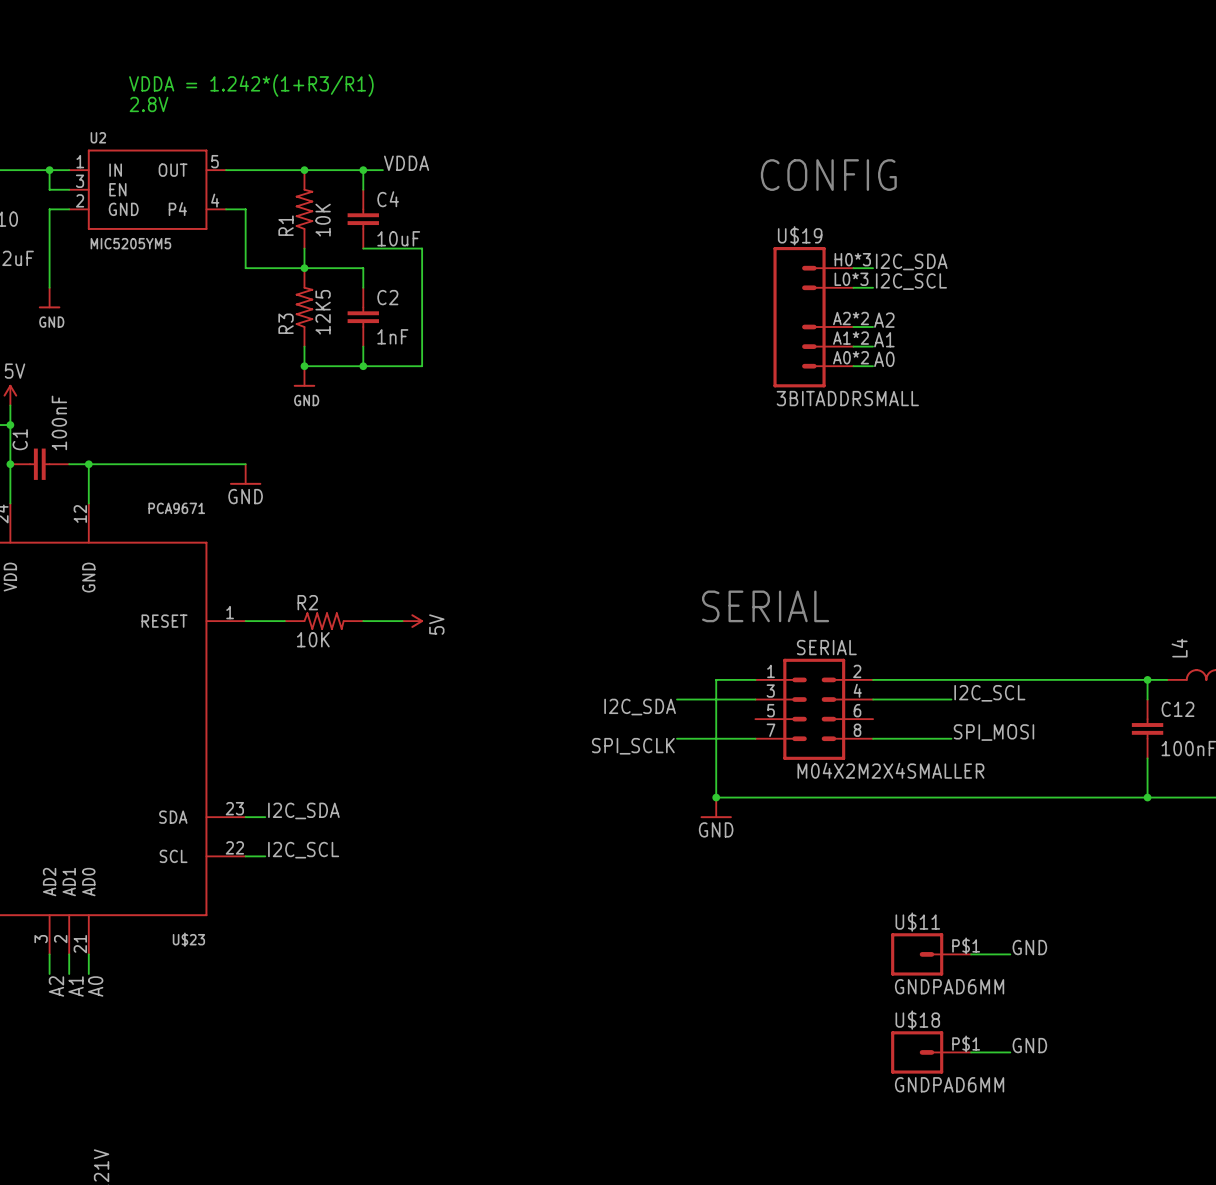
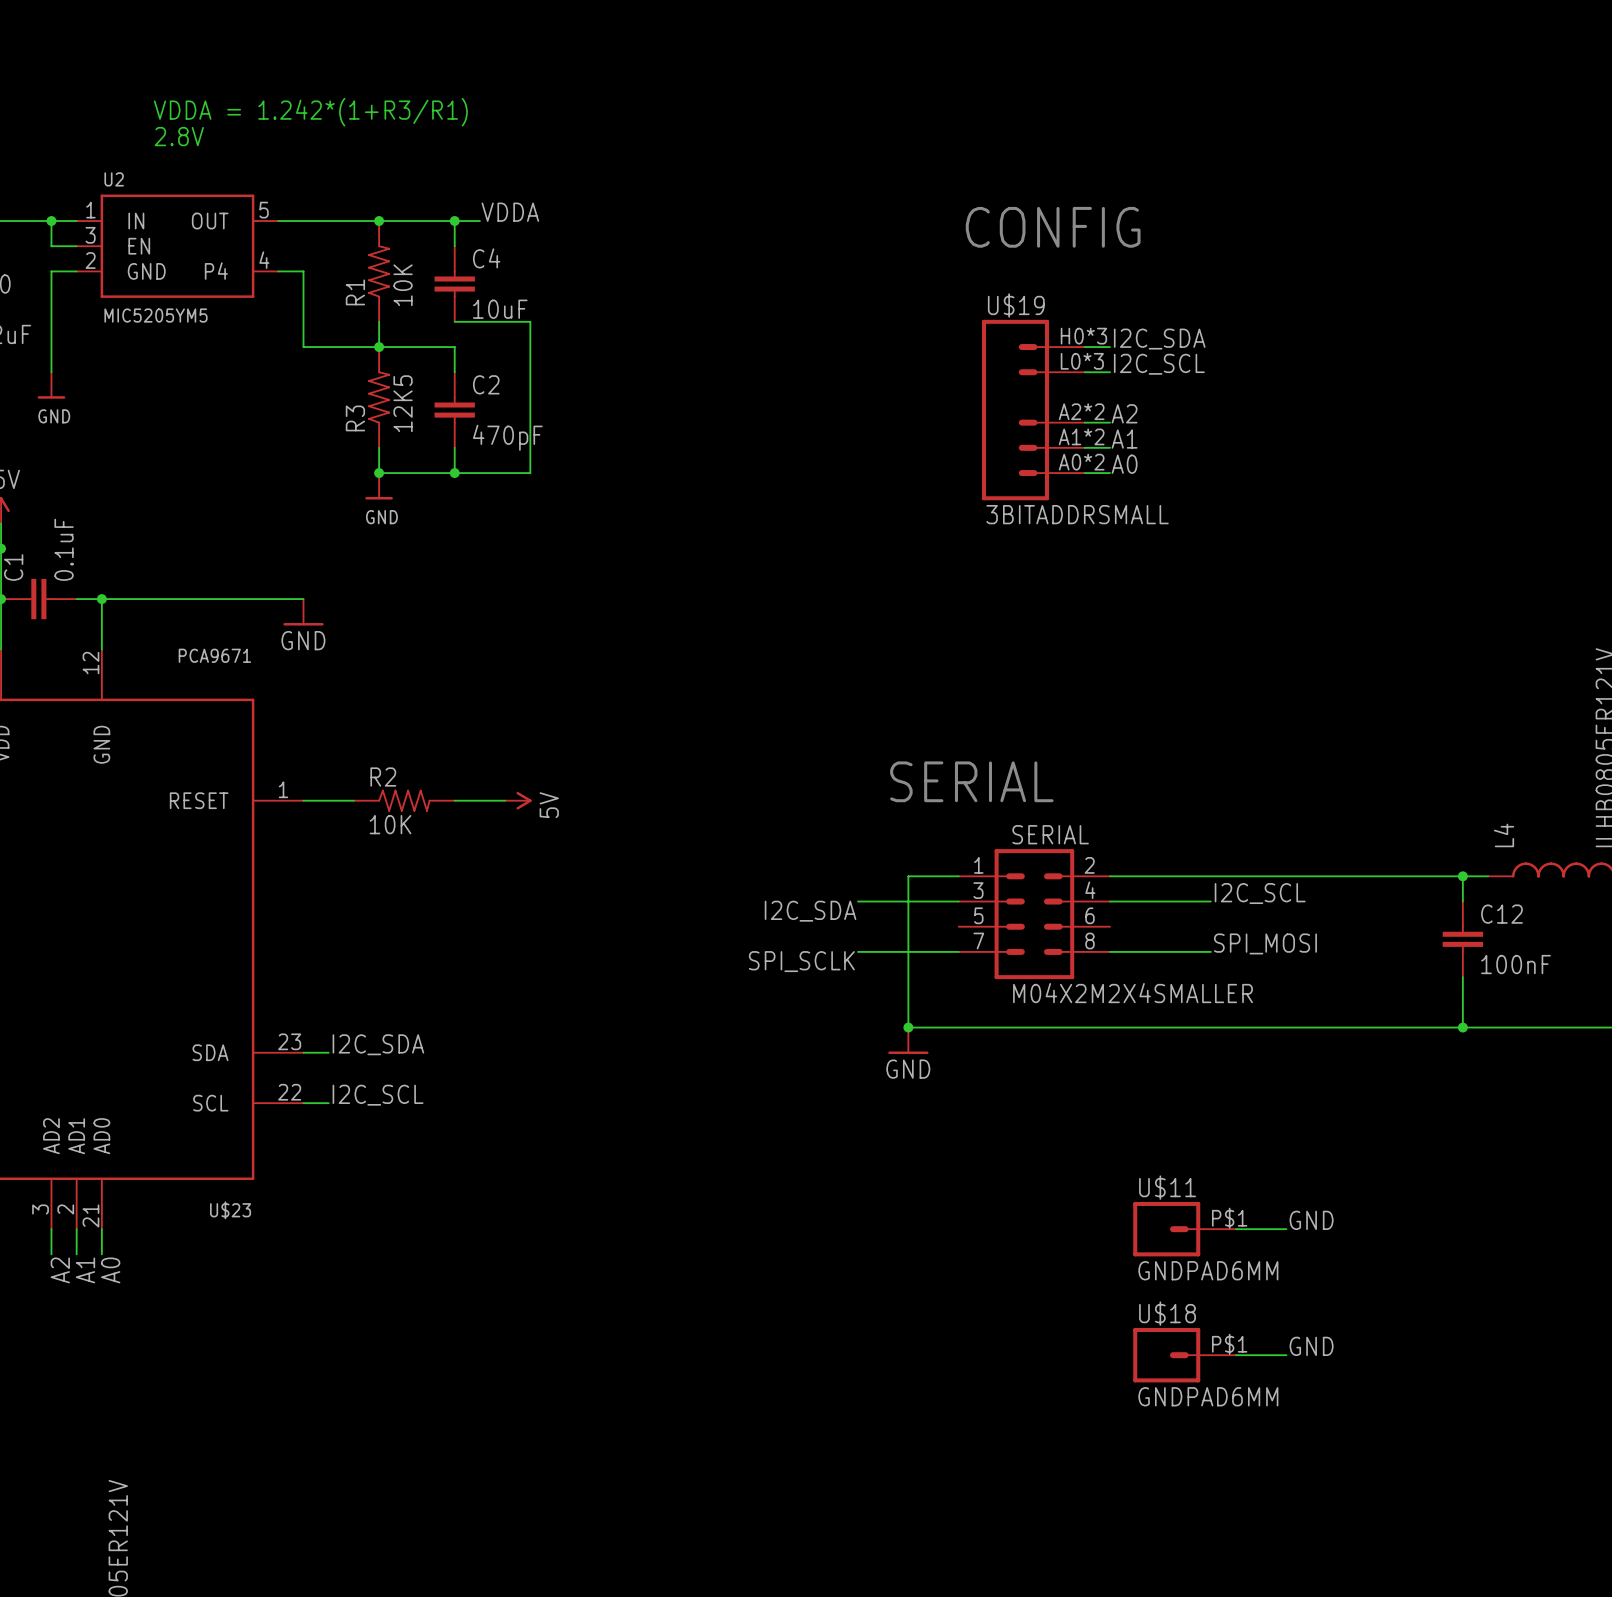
C2 value: 1nF (392, 336) -> 470pF (507, 437)
C1 value: 100nF (59, 422) -> 0.1uF (64, 549)

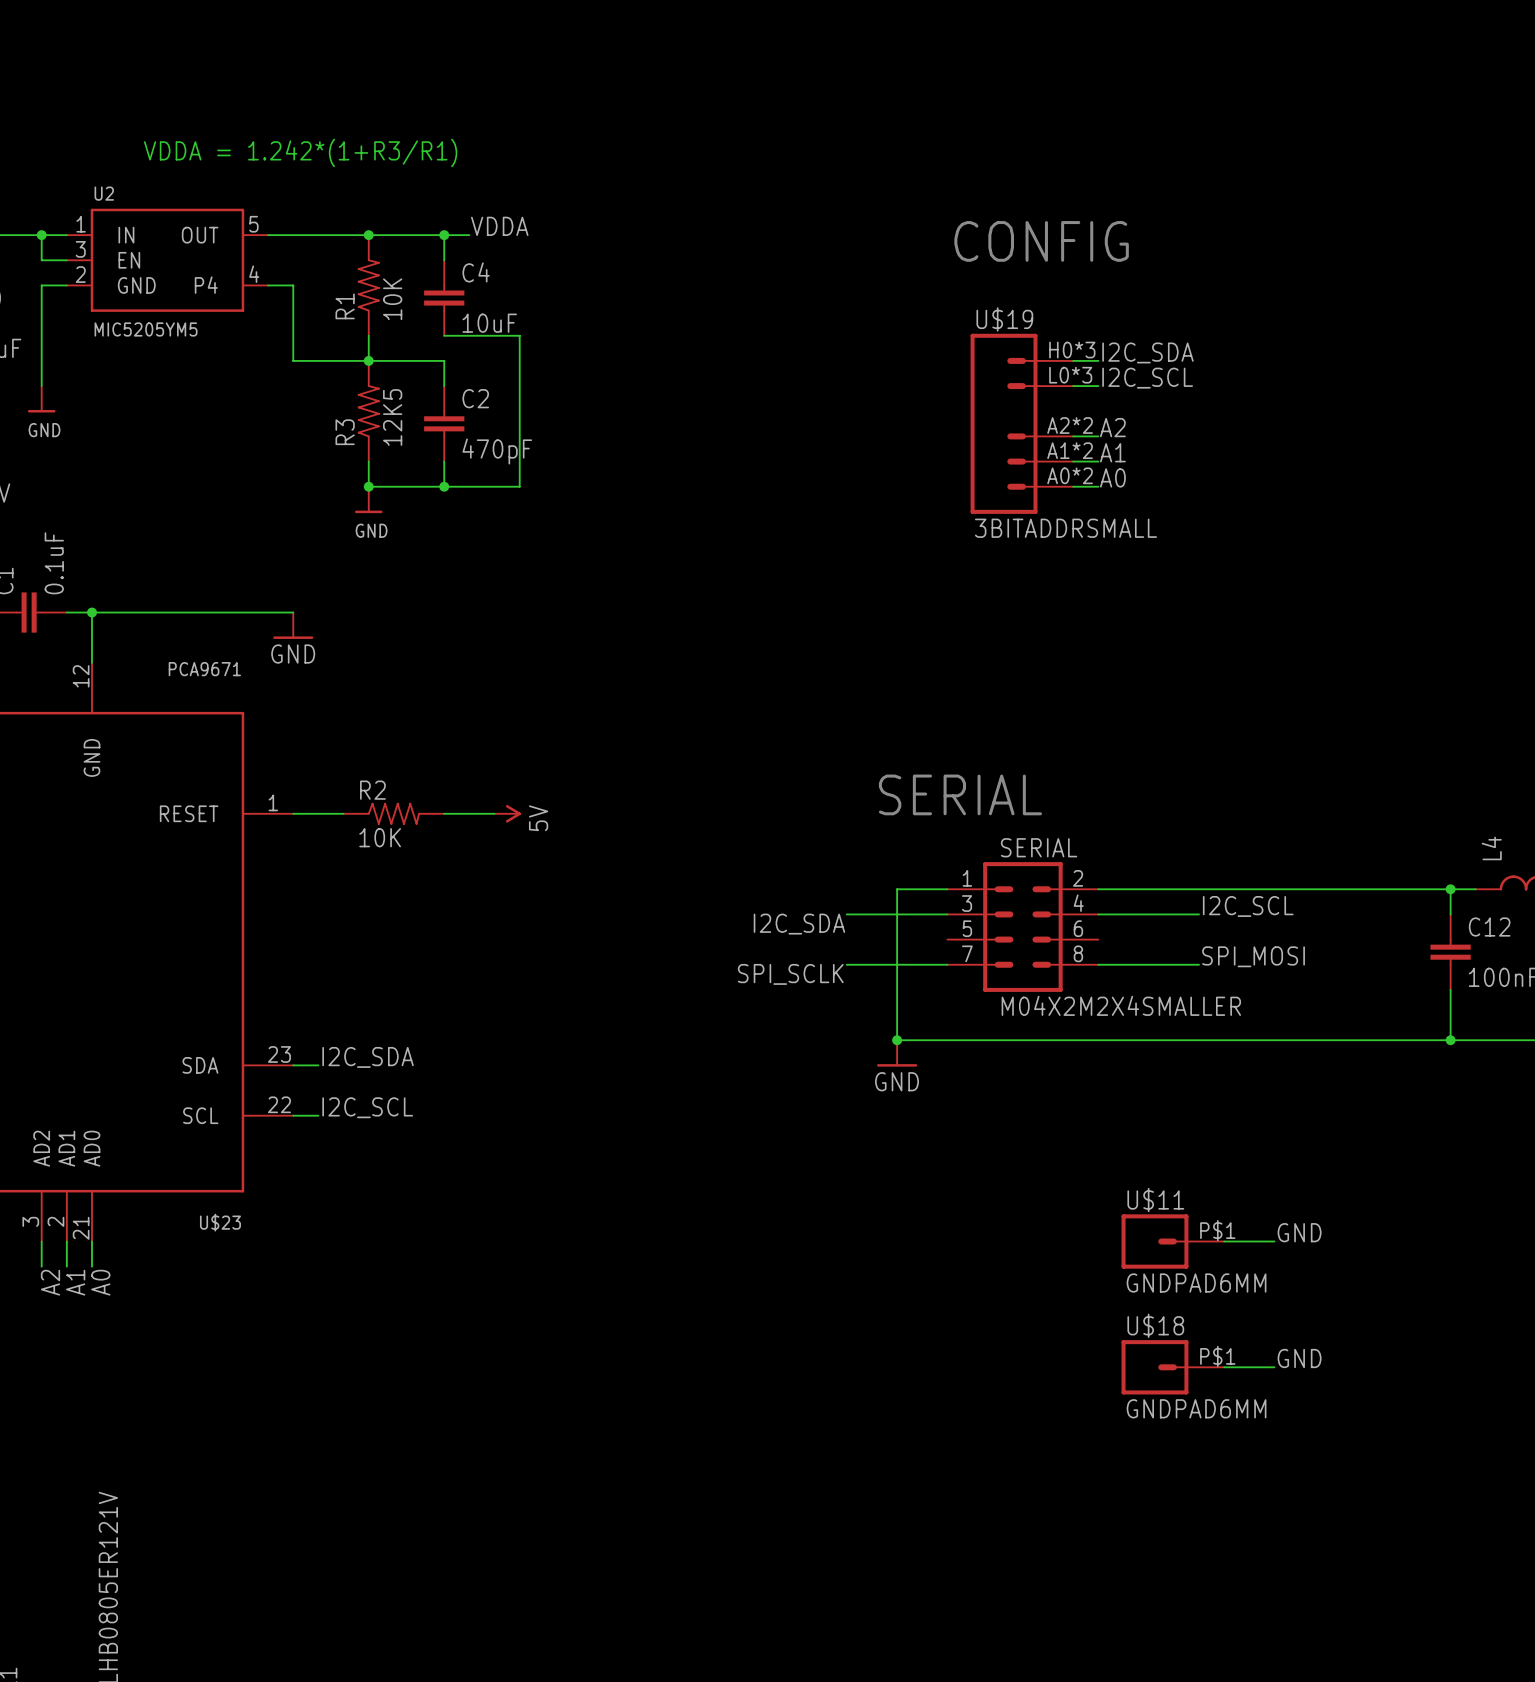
text: VDDA = 1.242*(1+R3/R1) (310, 112) -> none
text: 2.8V (179, 136) -> VDDA = 1.242*(1+R3/R1) (300, 152)

